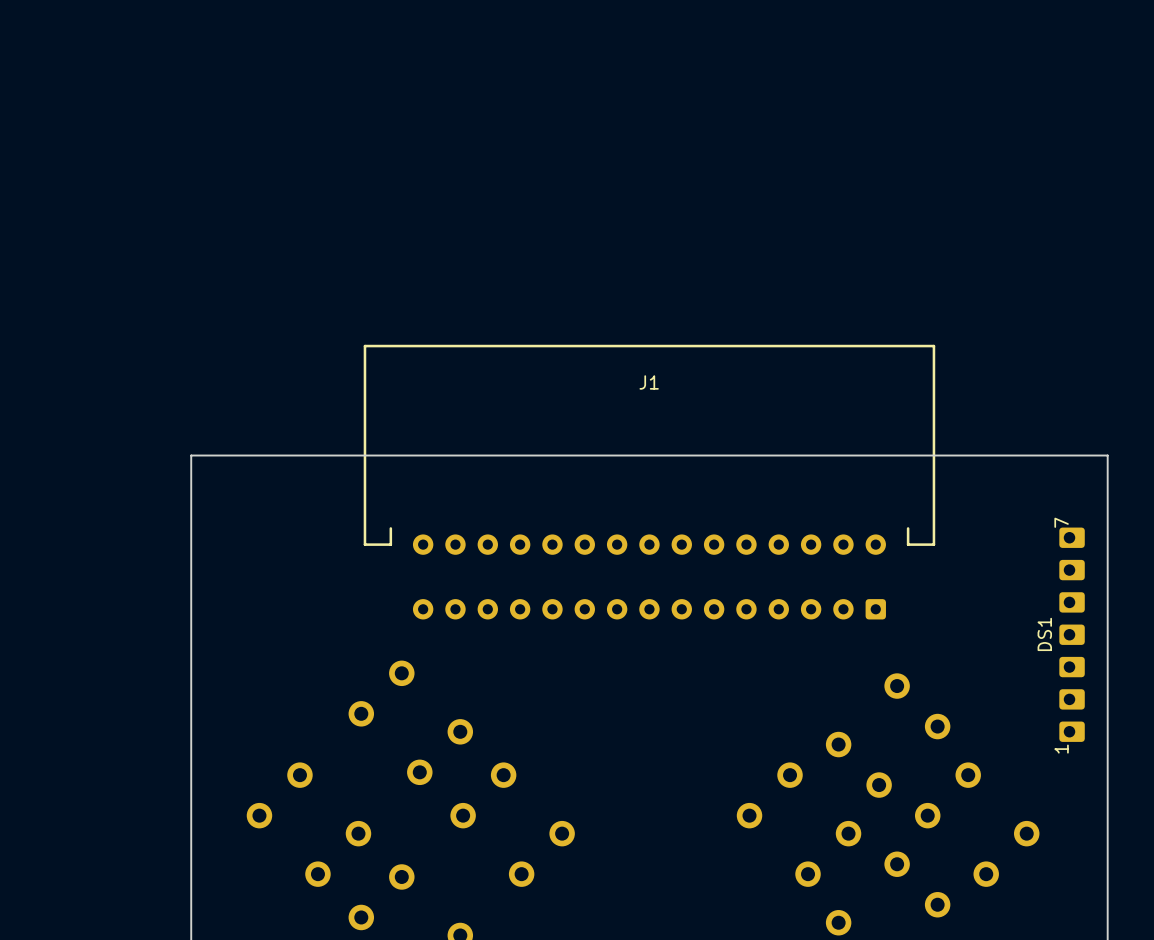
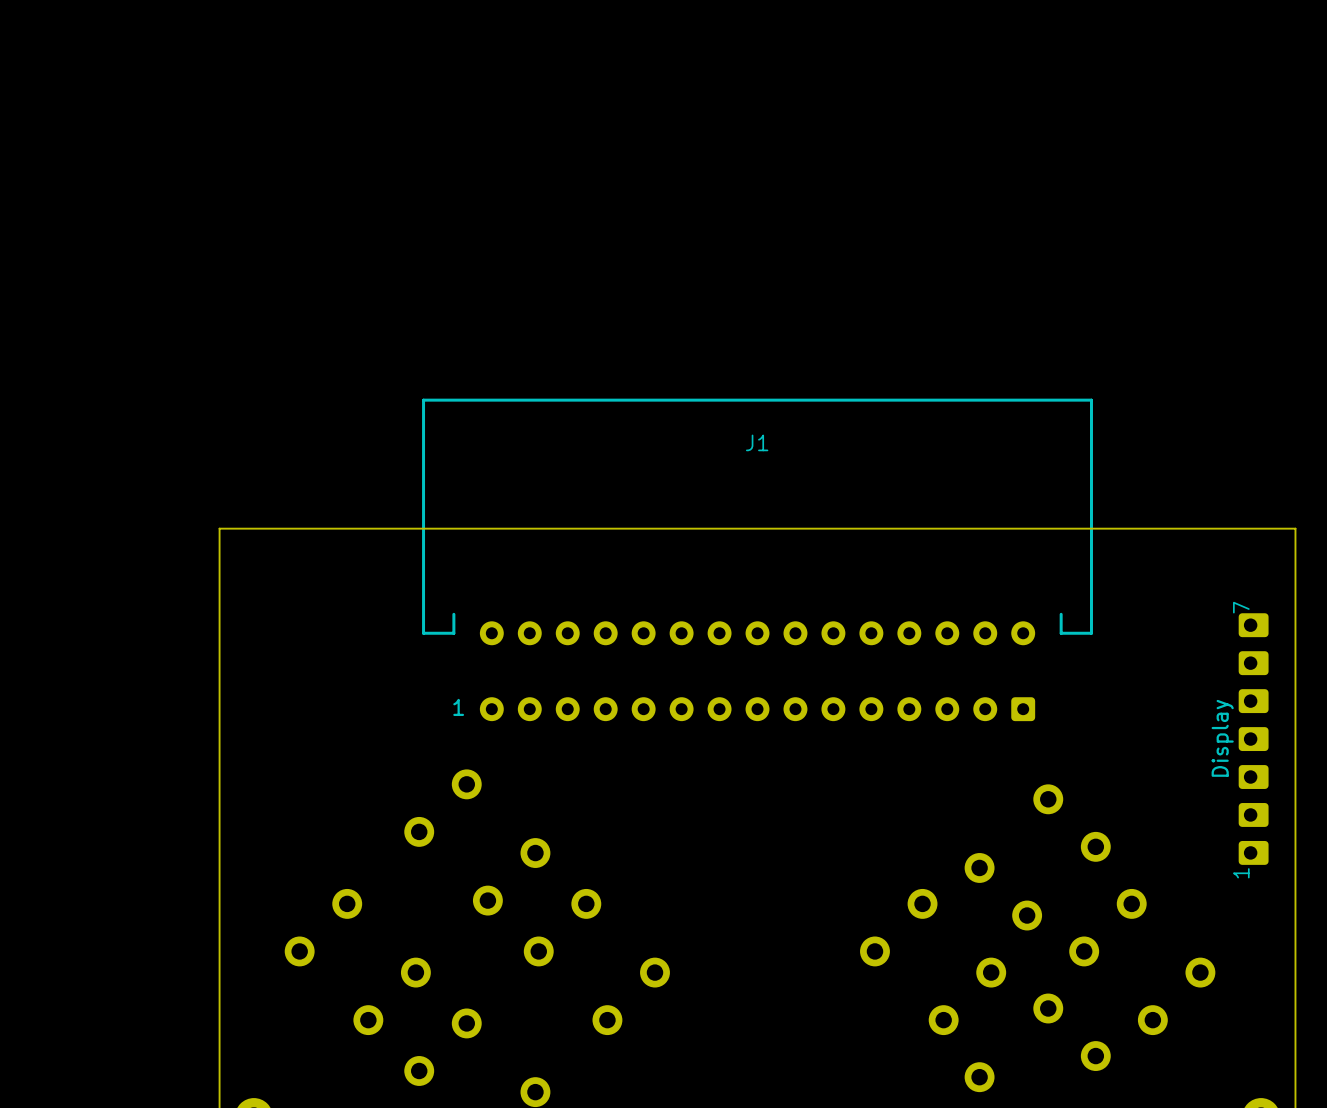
text: none -> 1 (458, 707)
DS1 name: DS1 (1044, 634) -> none
DS1 value: none -> Display (1222, 738)

